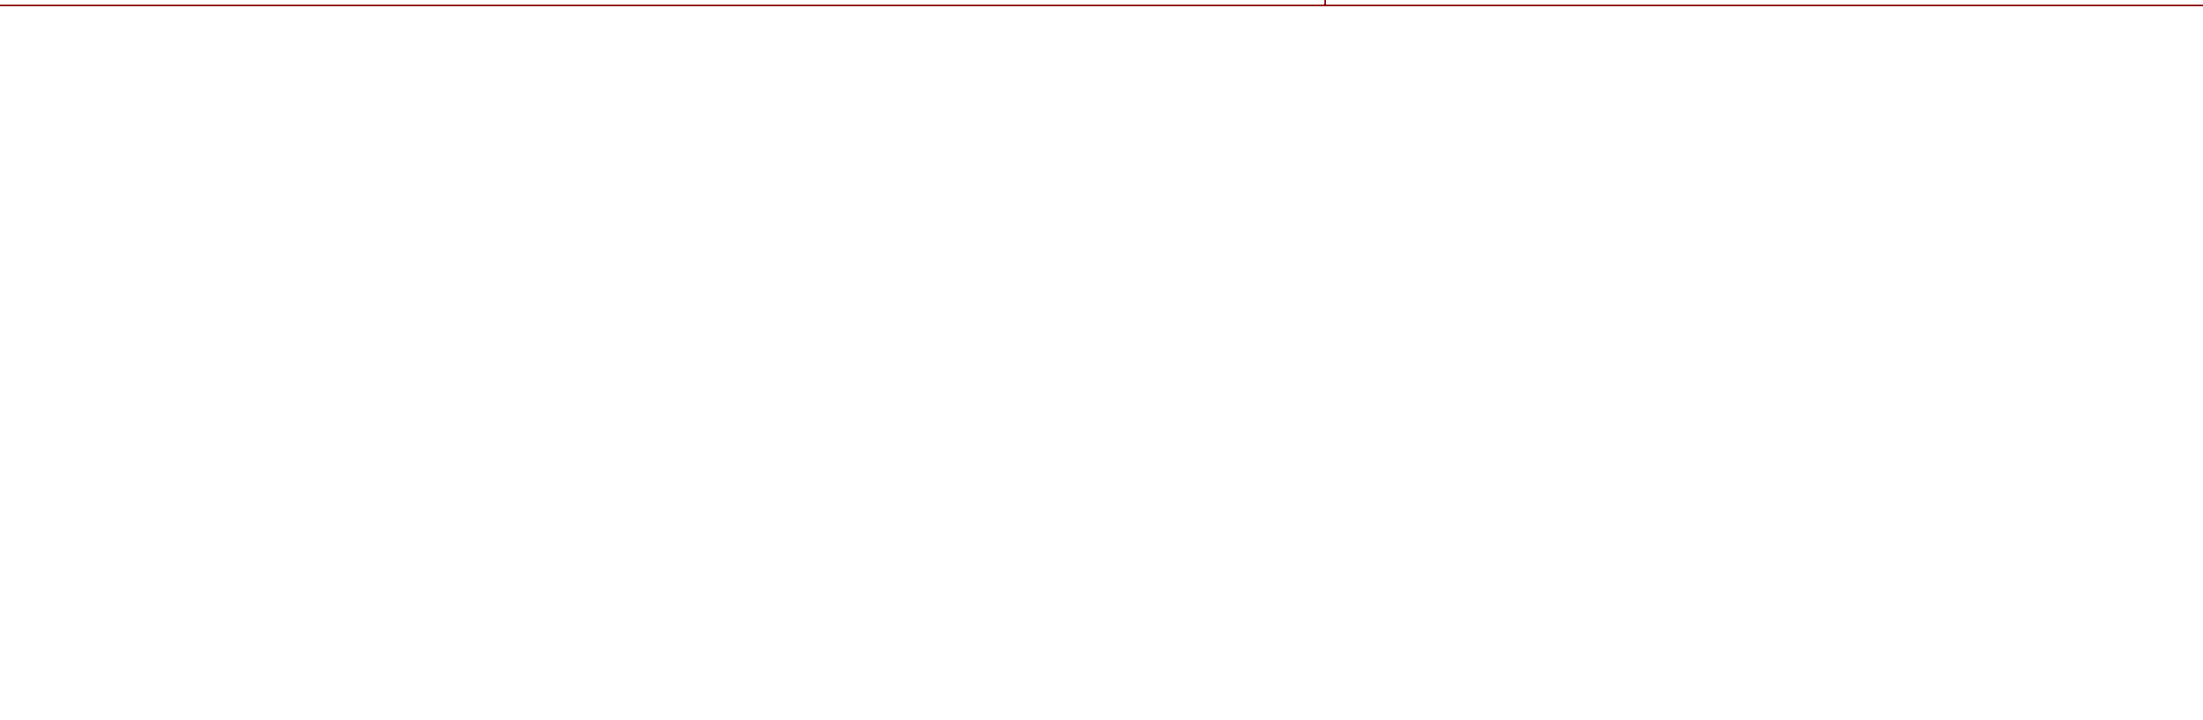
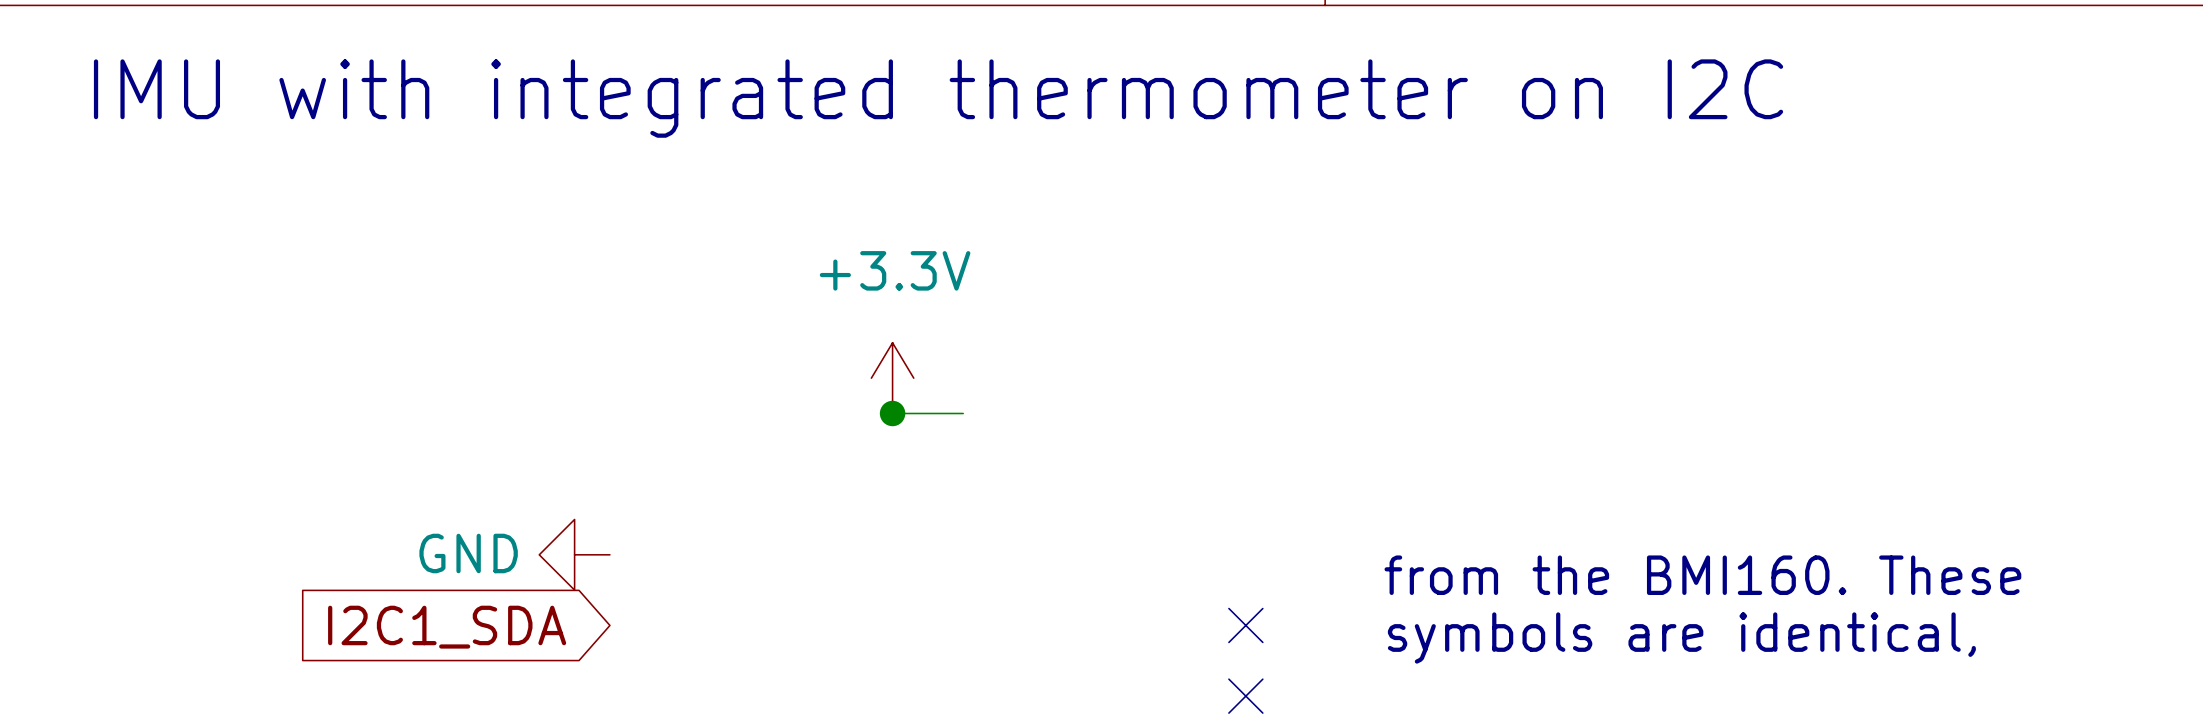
text: none -> IMU with integrated thermometer on I2C (938, 98)
power symbol: none -> +3.3V (892, 378)
wire: none -> (892, 413) (963, 413)
junction: none -> (892, 413)
power symbol: none -> GND (574, 554)
text: none -> from the BMI160. These (1702, 575)
no-connect mark: none -> (1245, 625)
global label: none -> I2C1_SDA (447, 627)
text: none -> symbols are identical, (1681, 637)
no-connect mark: none -> (1245, 696)

